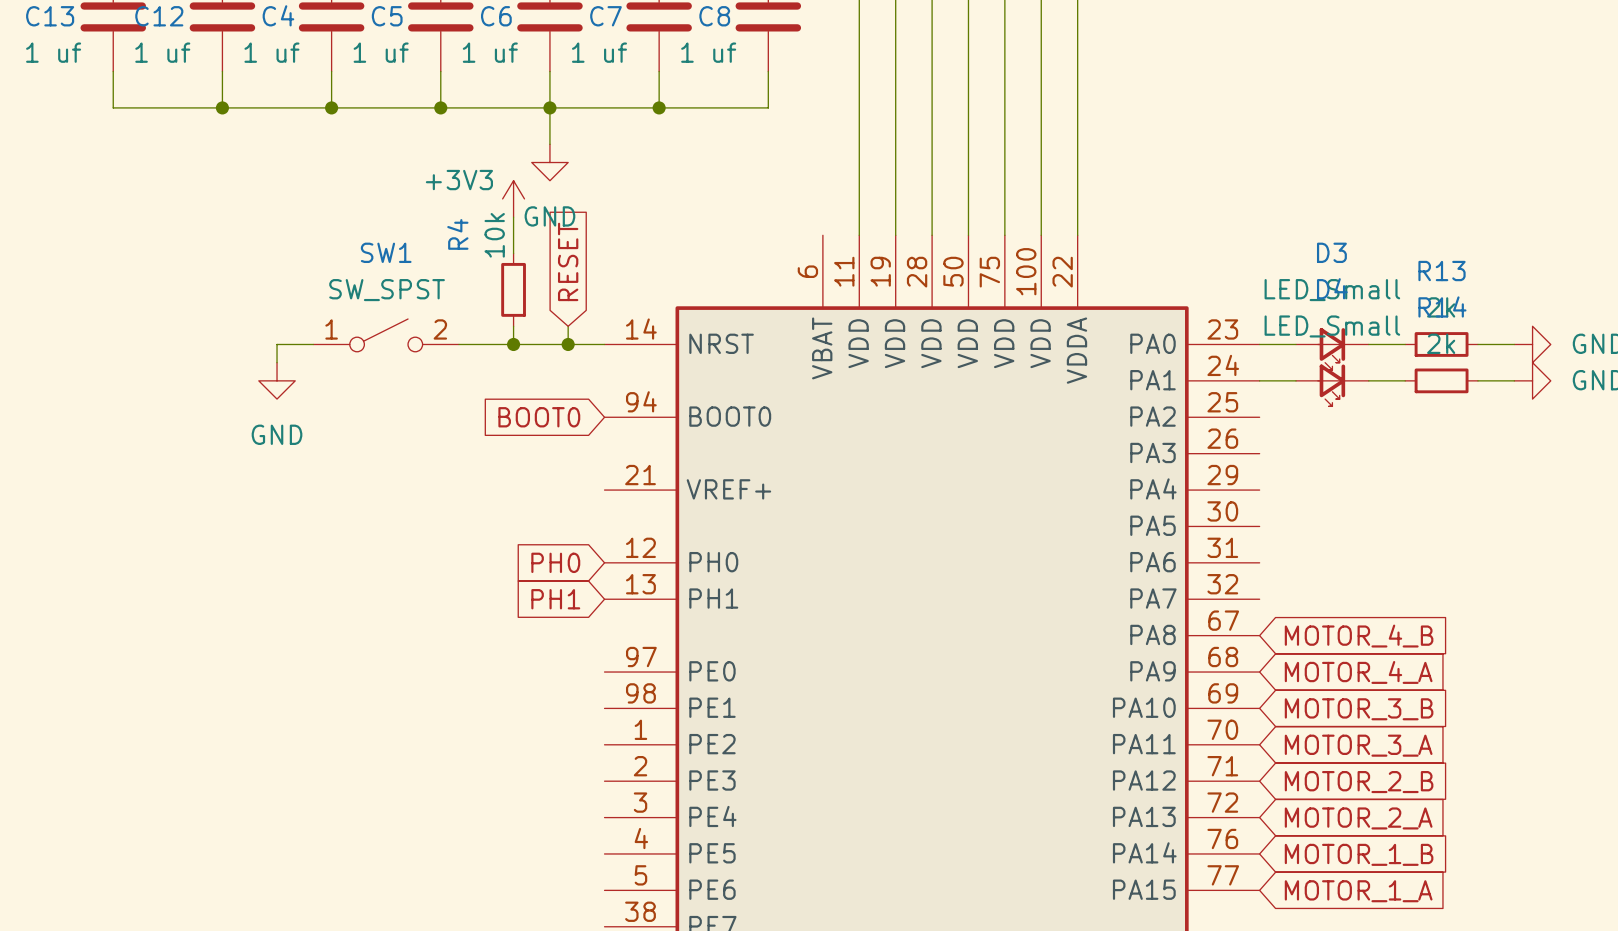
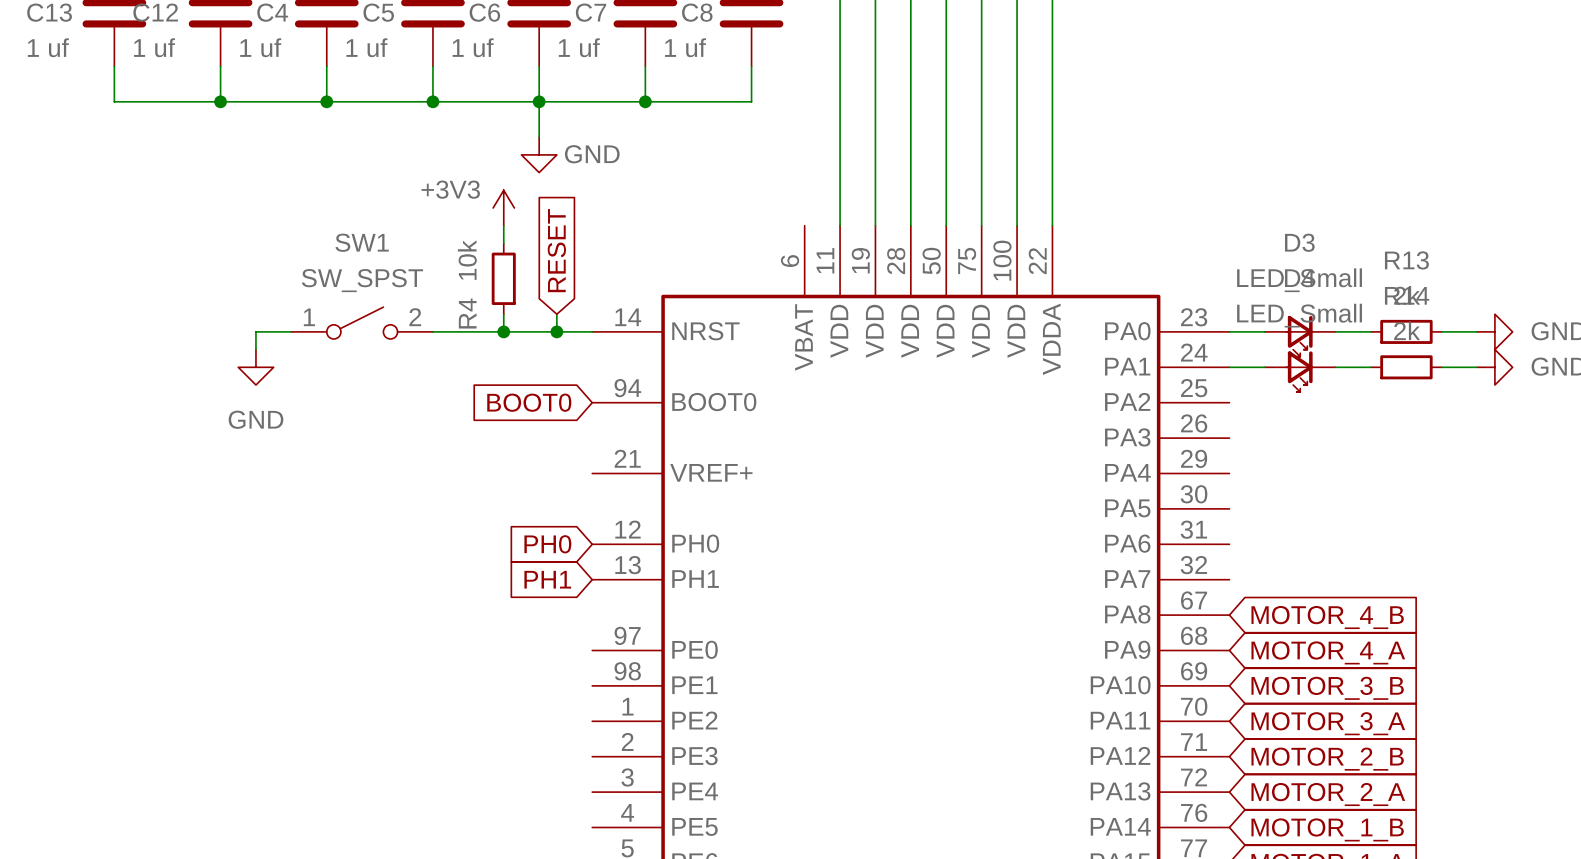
power symbol position: +3V3 (513, 198) -> +3V3 (503, 208)
power symbol text position: GND (549, 216) -> GND (592, 154)
R4 name position: R4 (457, 234) -> R4 (467, 313)
R4 value position: 10k (494, 235) -> 10k (467, 260)
SW1 position: (386, 335) -> (362, 323)
wire: (277, 344) (277, 362) -> (273, 331) (255, 331) (255, 349)
power symbol position: GND (277, 380) -> GND (255, 367)

